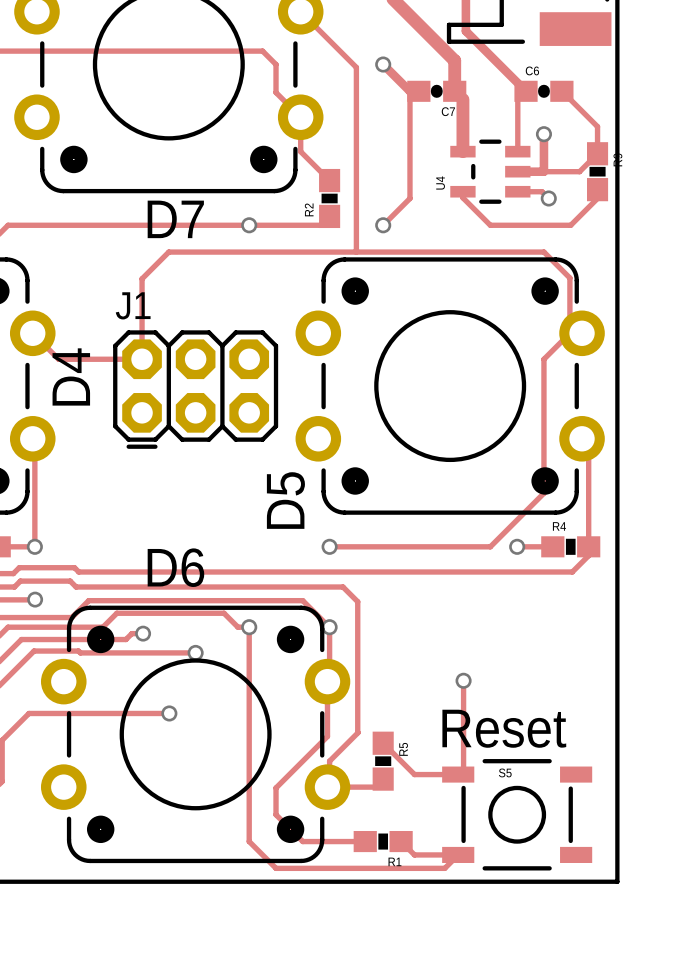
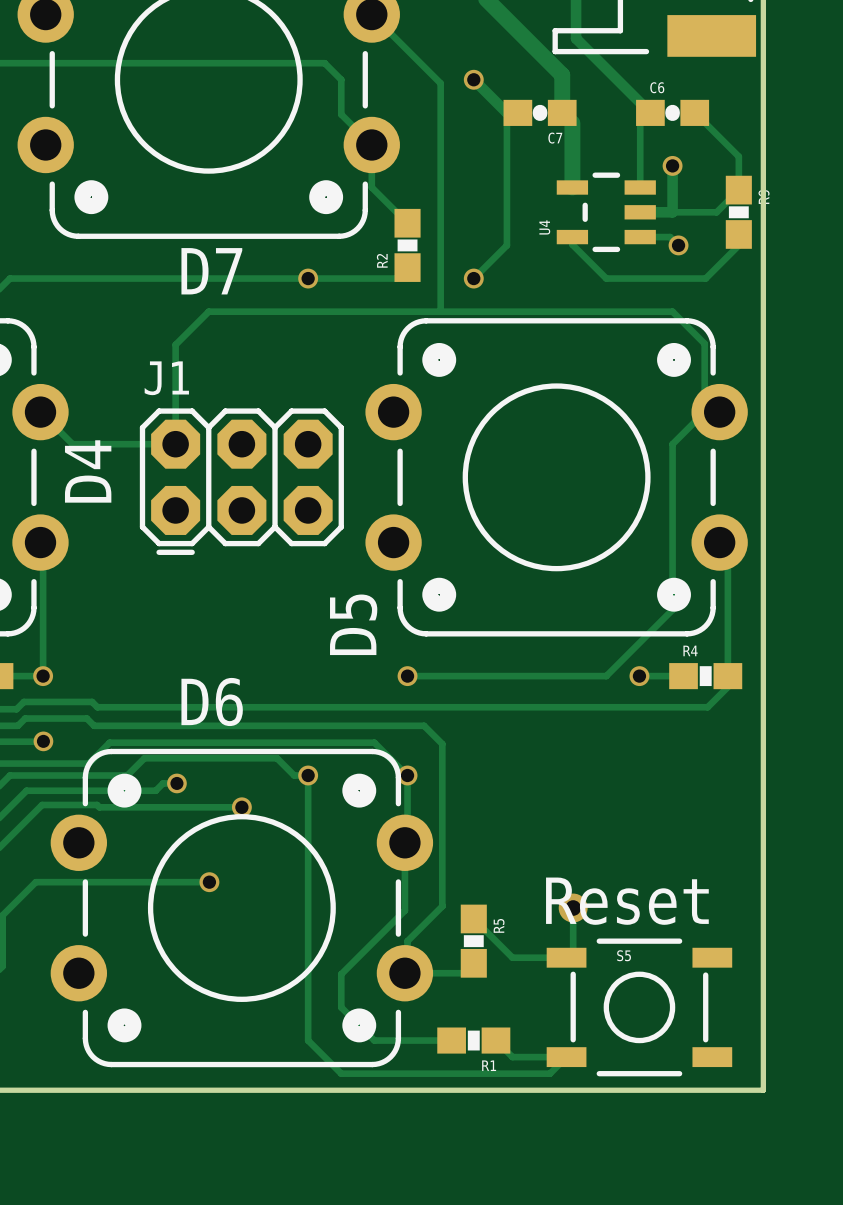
track: (463, 680) (463, 734) -> none
via: (463, 680) -> none
via: none -> (573, 908)

